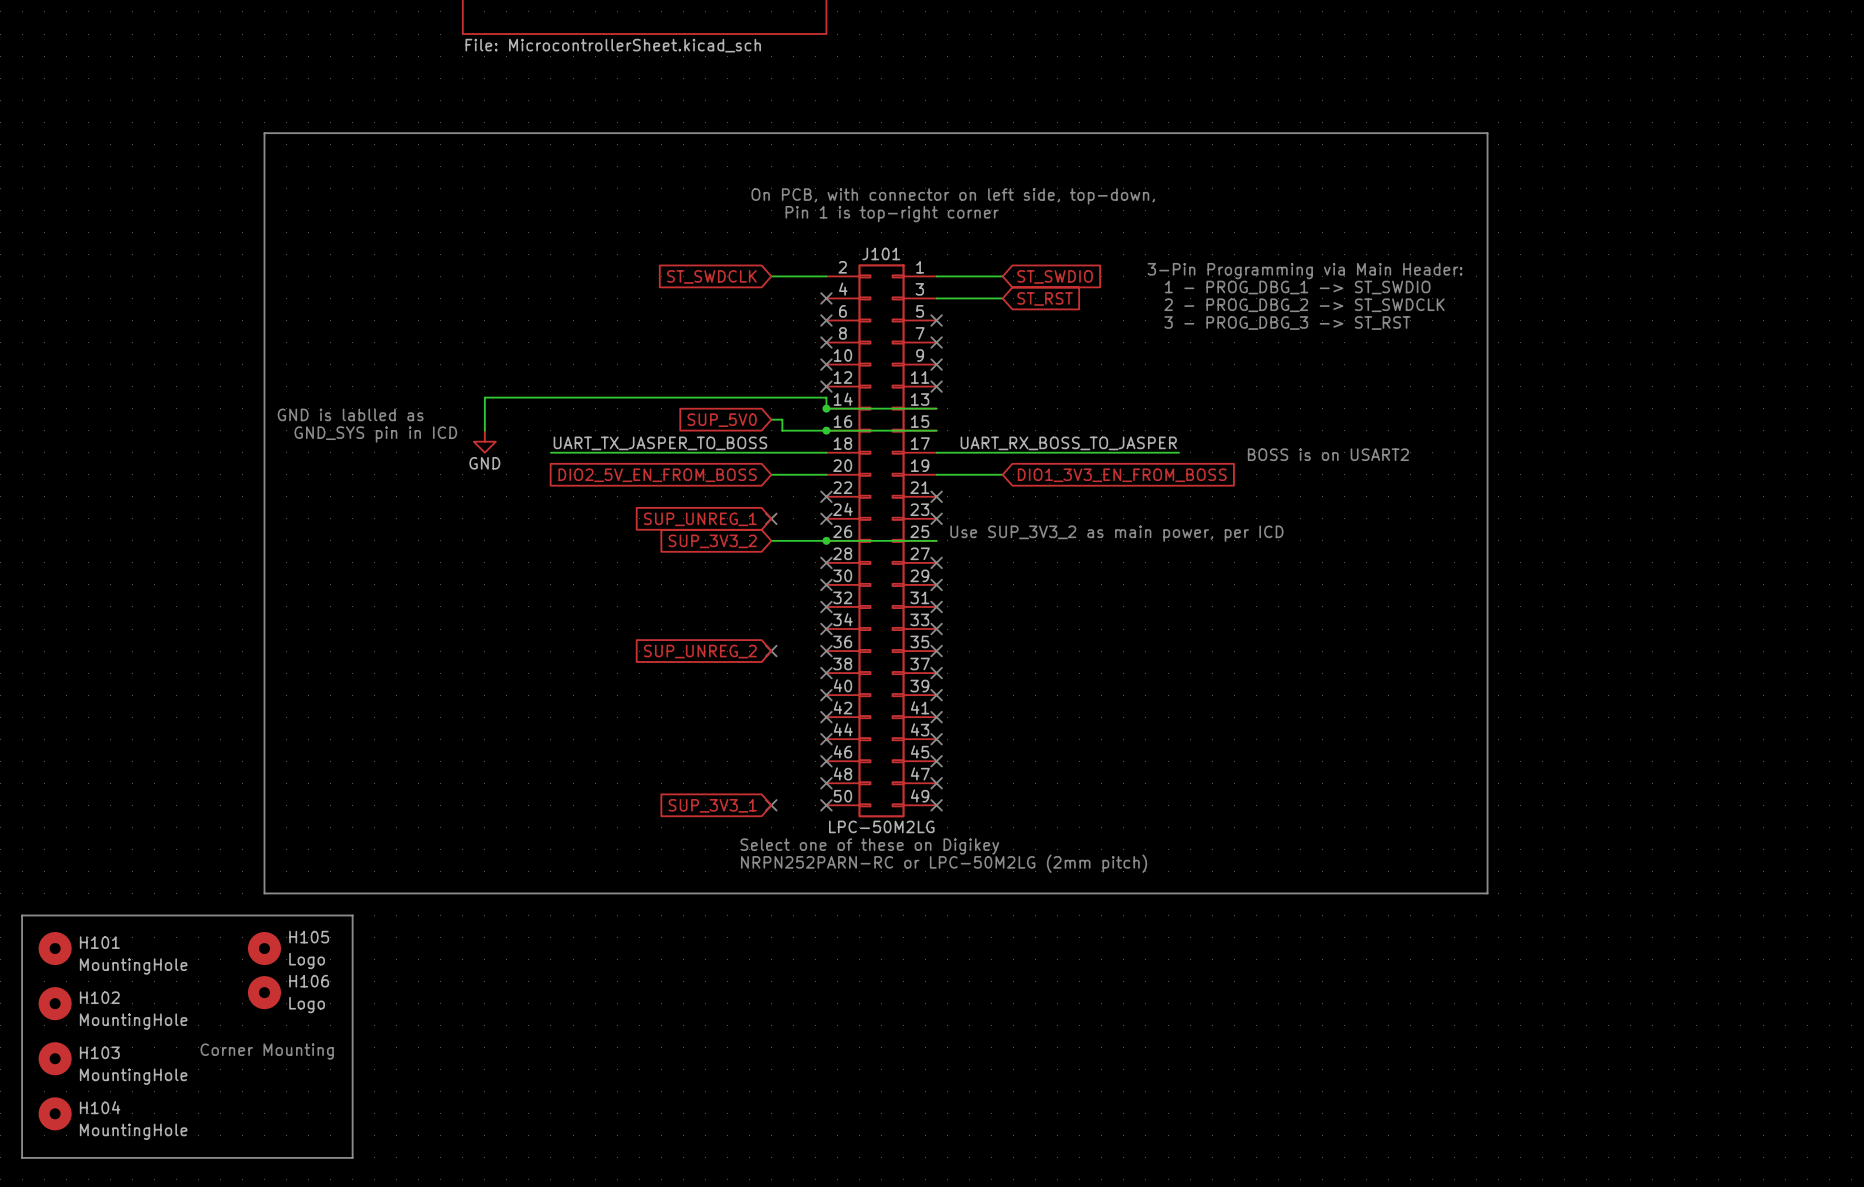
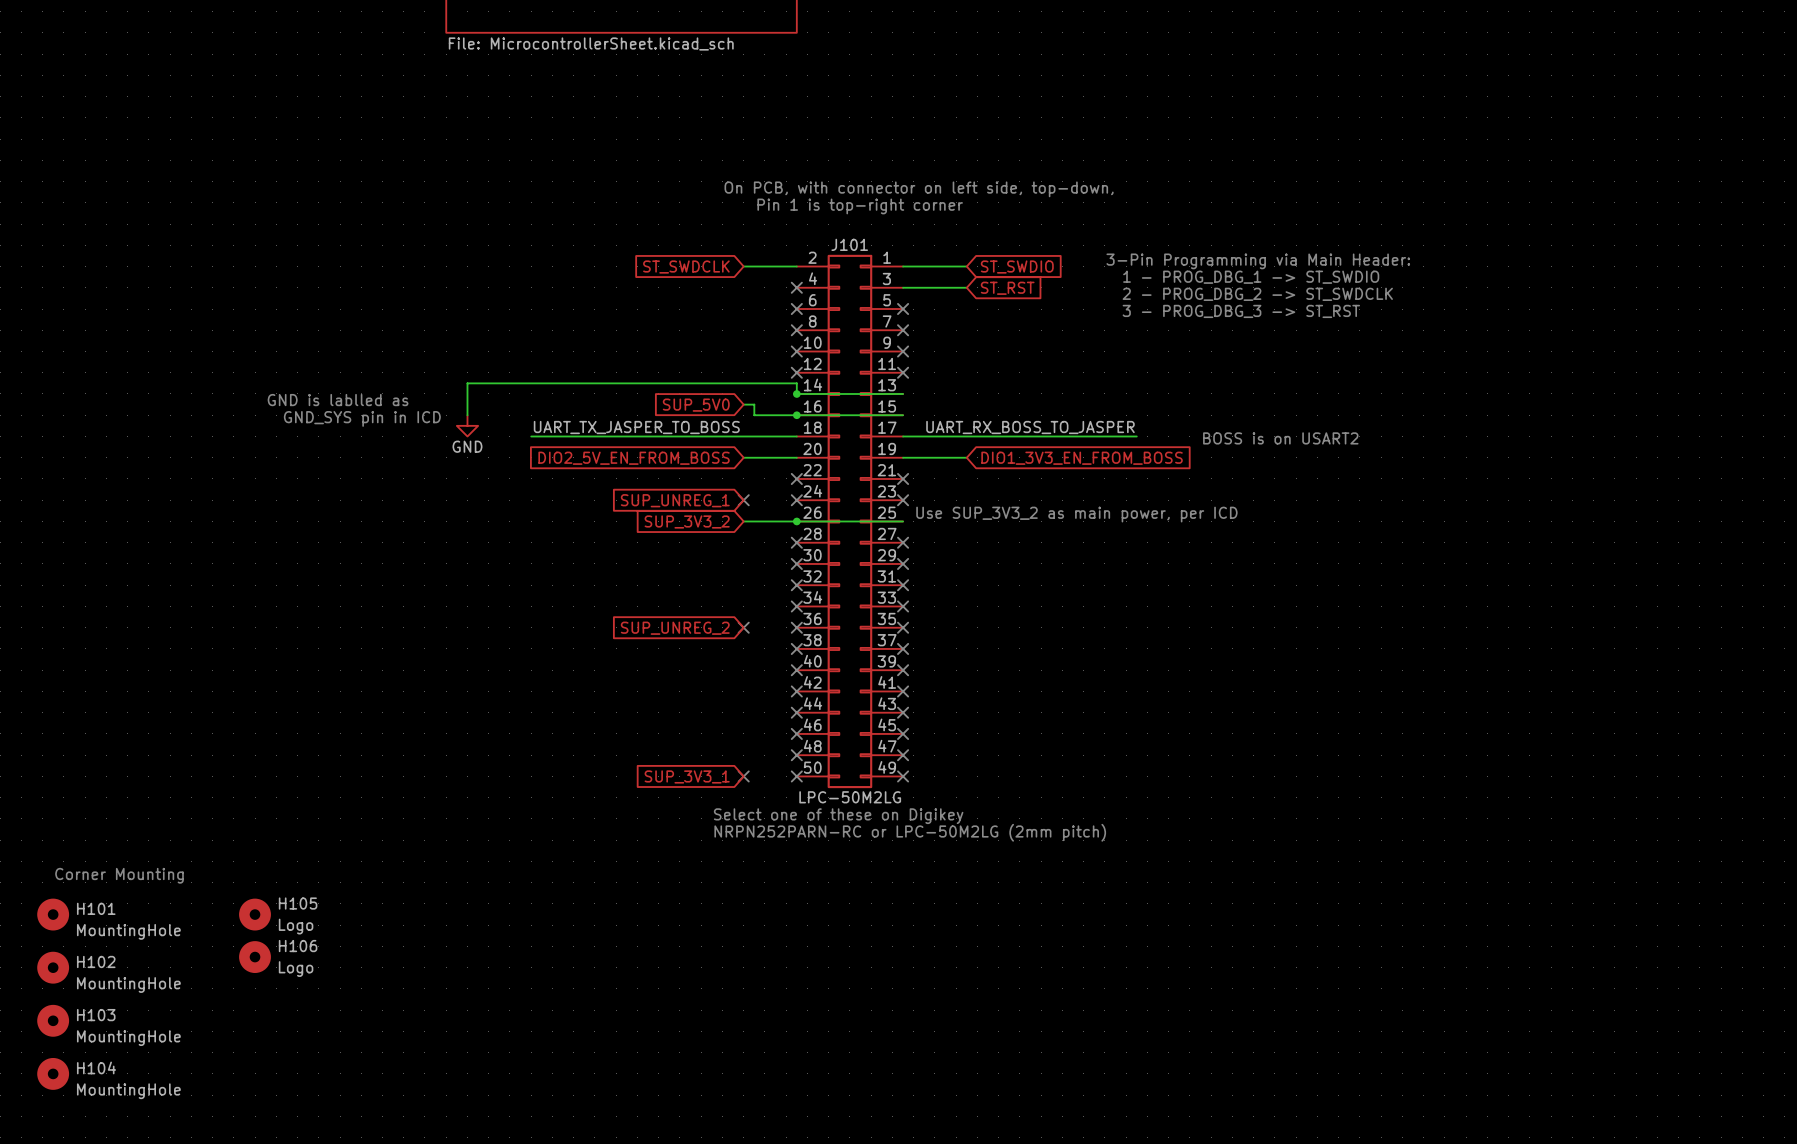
line: (264, 133) (1487, 133) (1487, 893) (264, 893) (264, 133) -> none
line: (22, 915) (352, 915) (352, 1157) (22, 1157) (22, 915) -> none
text position: Corner Mounting (267, 1051) -> Corner Mounting (119, 875)

